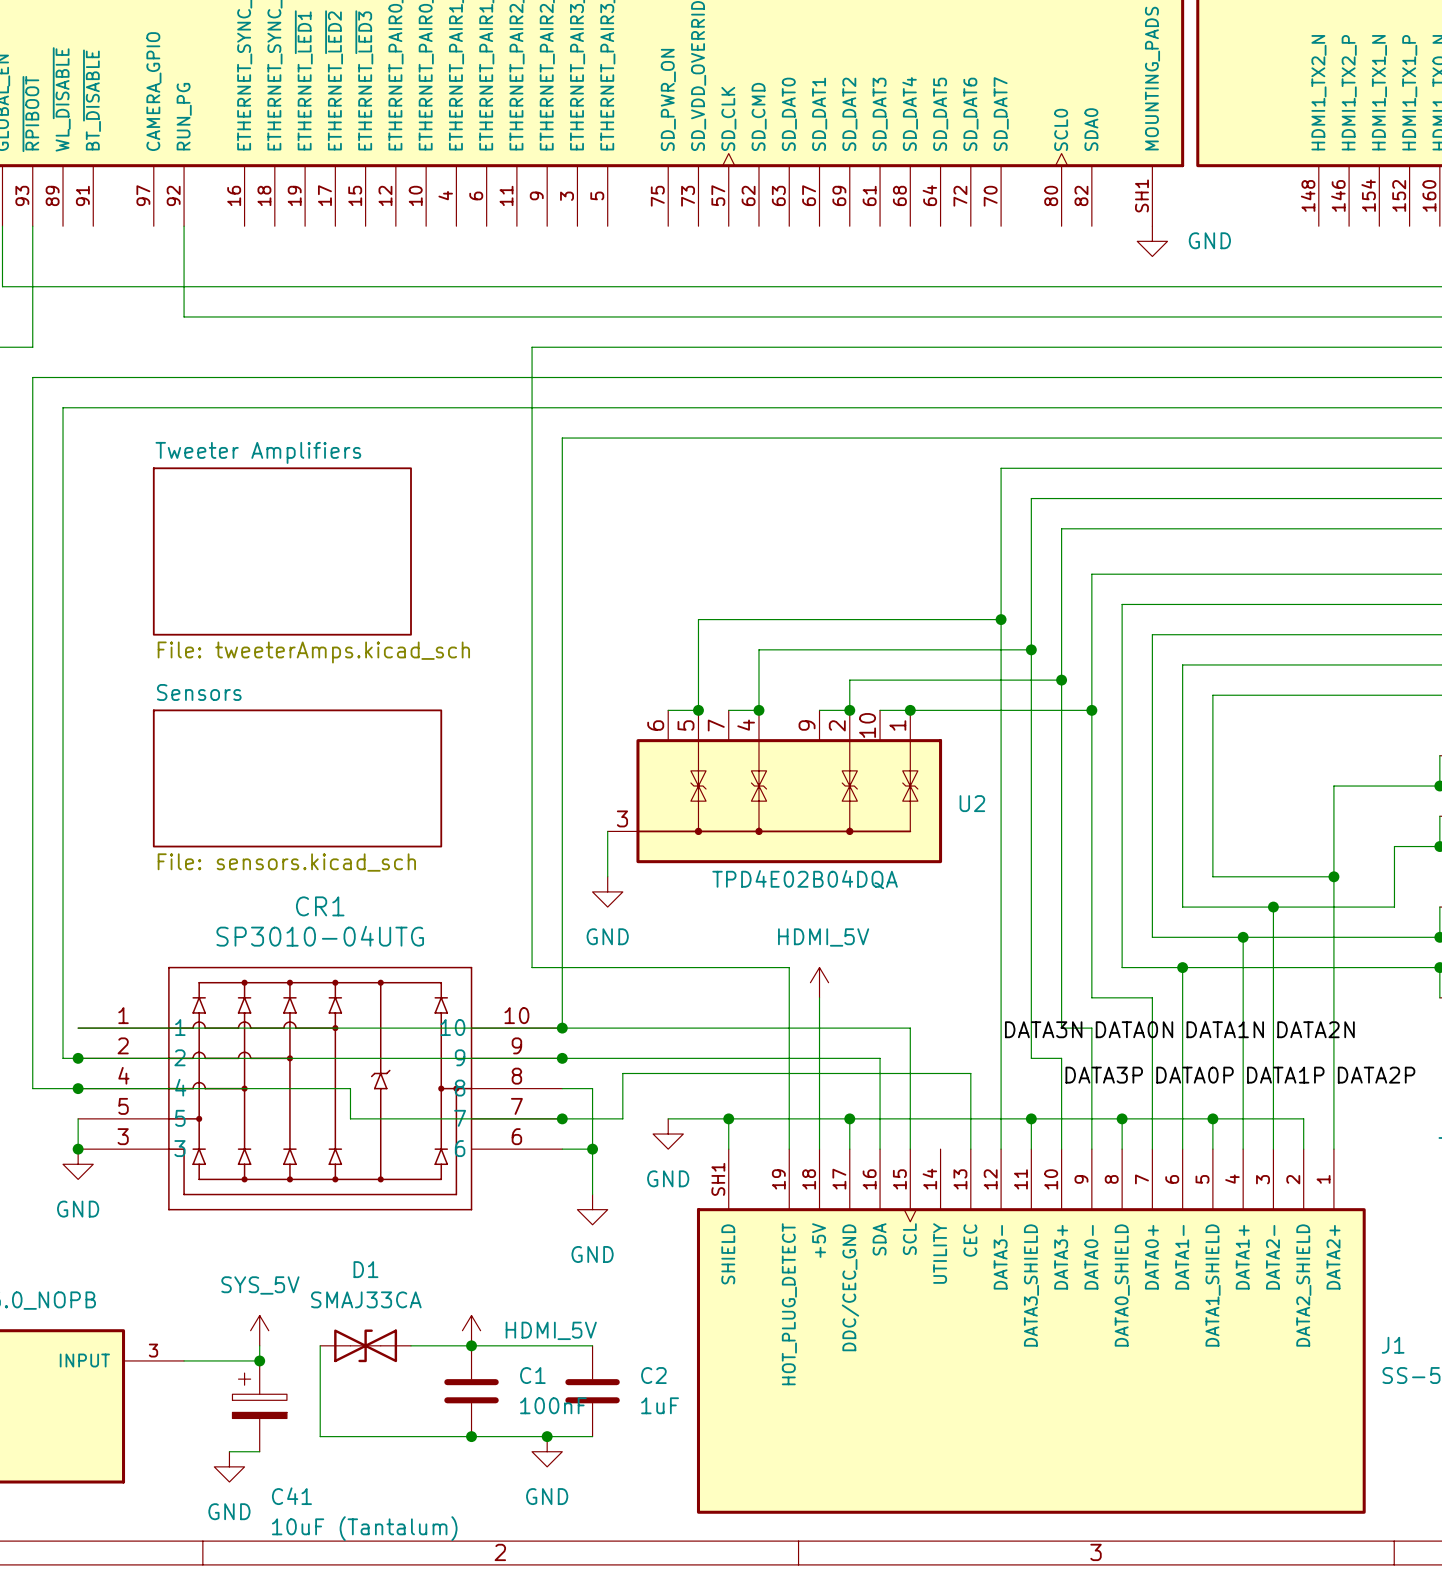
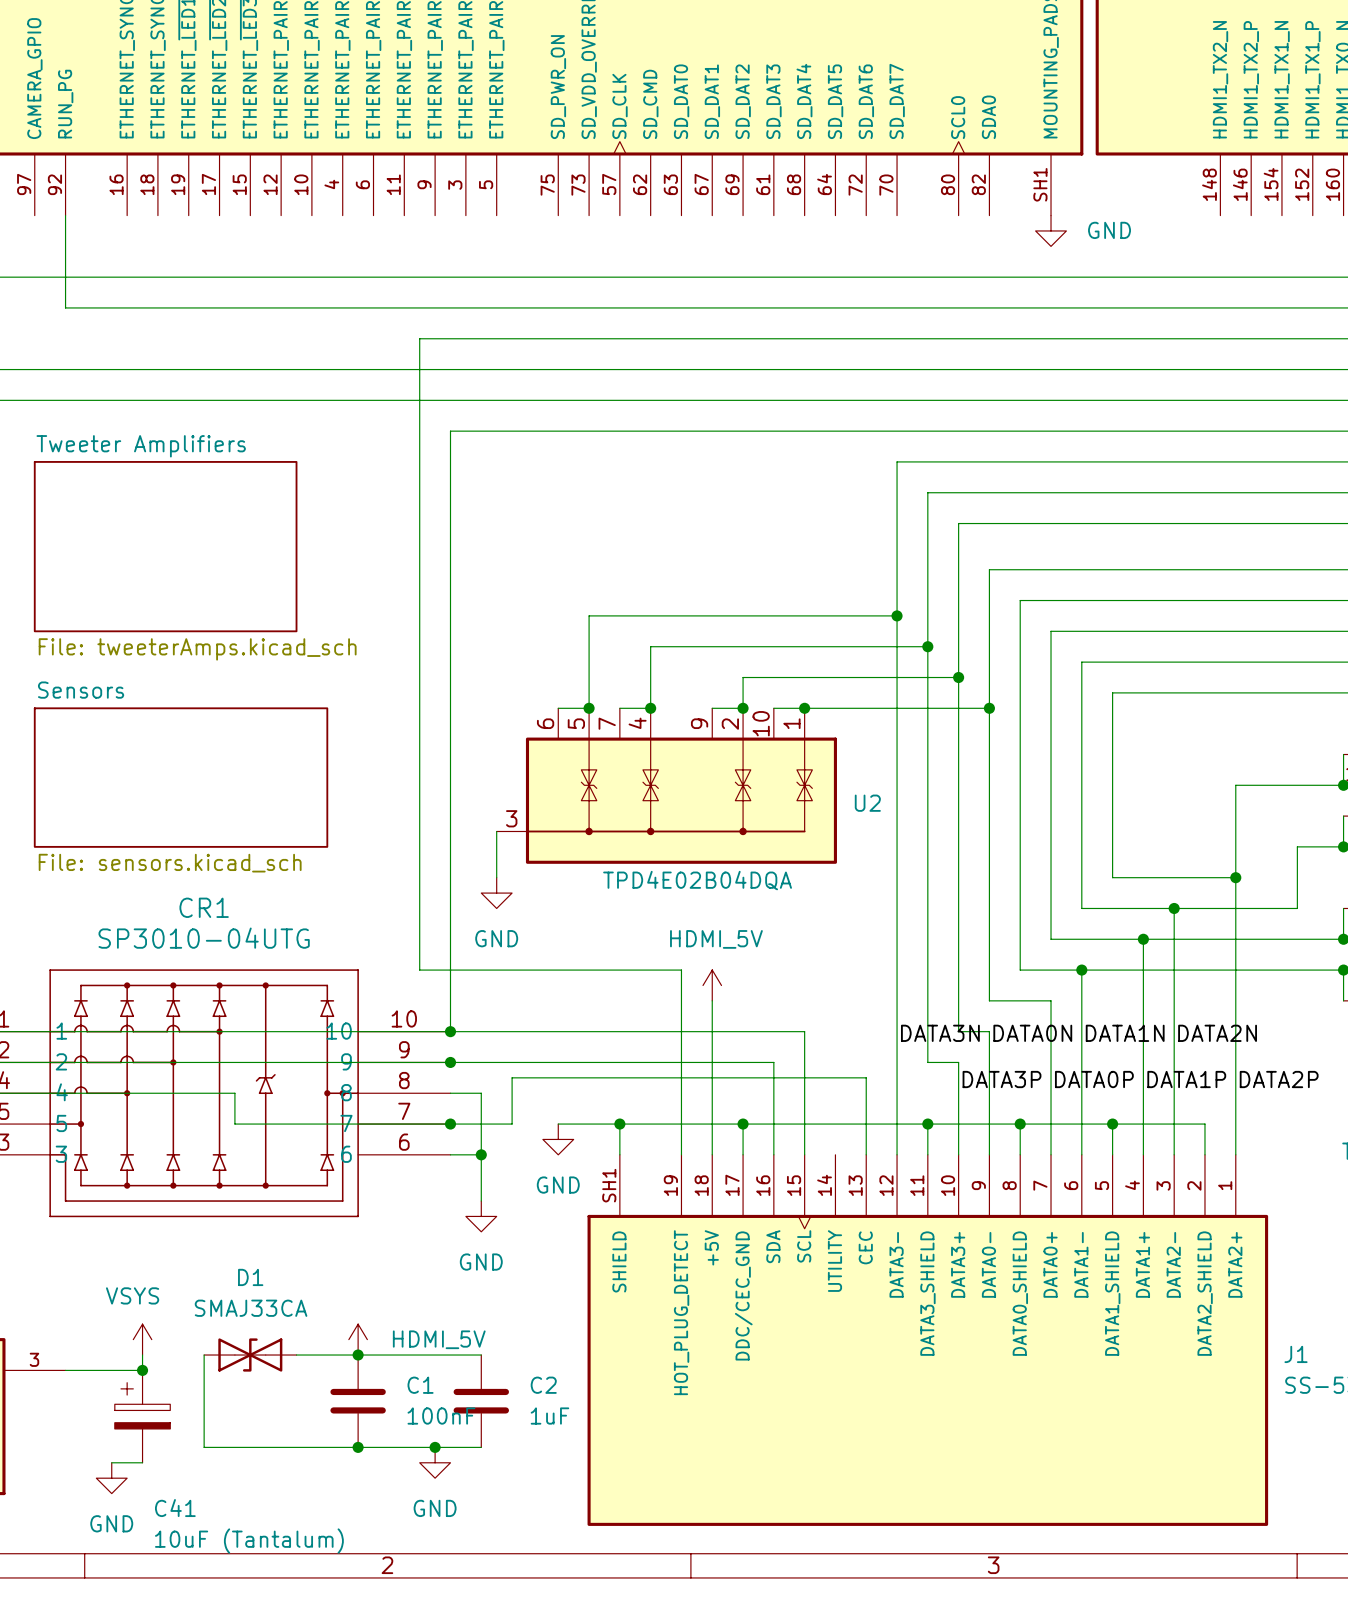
power symbol: SYS_5V (259, 1330) -> VSYS (142, 1339)

